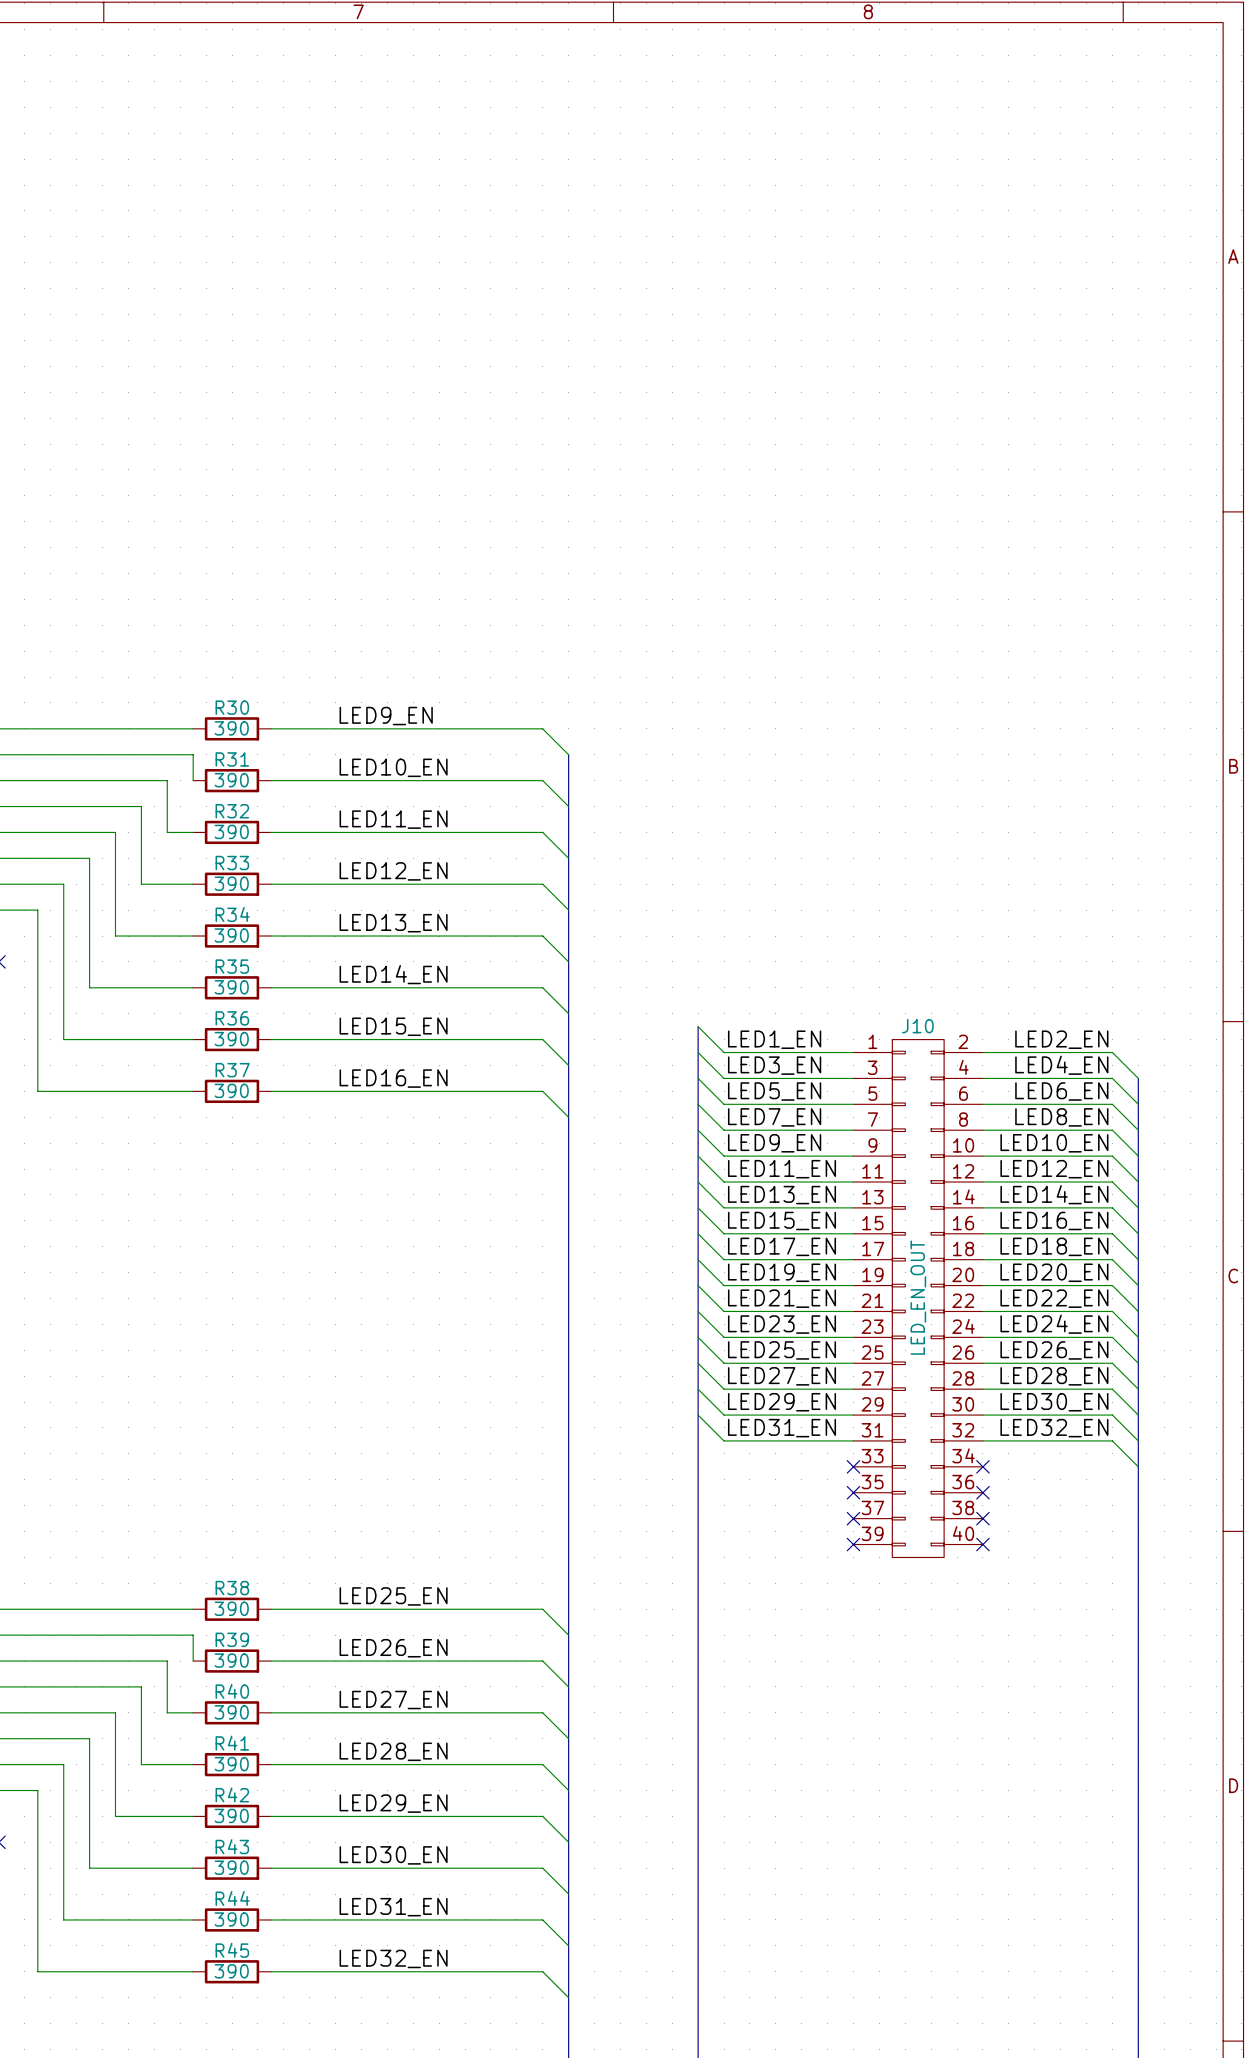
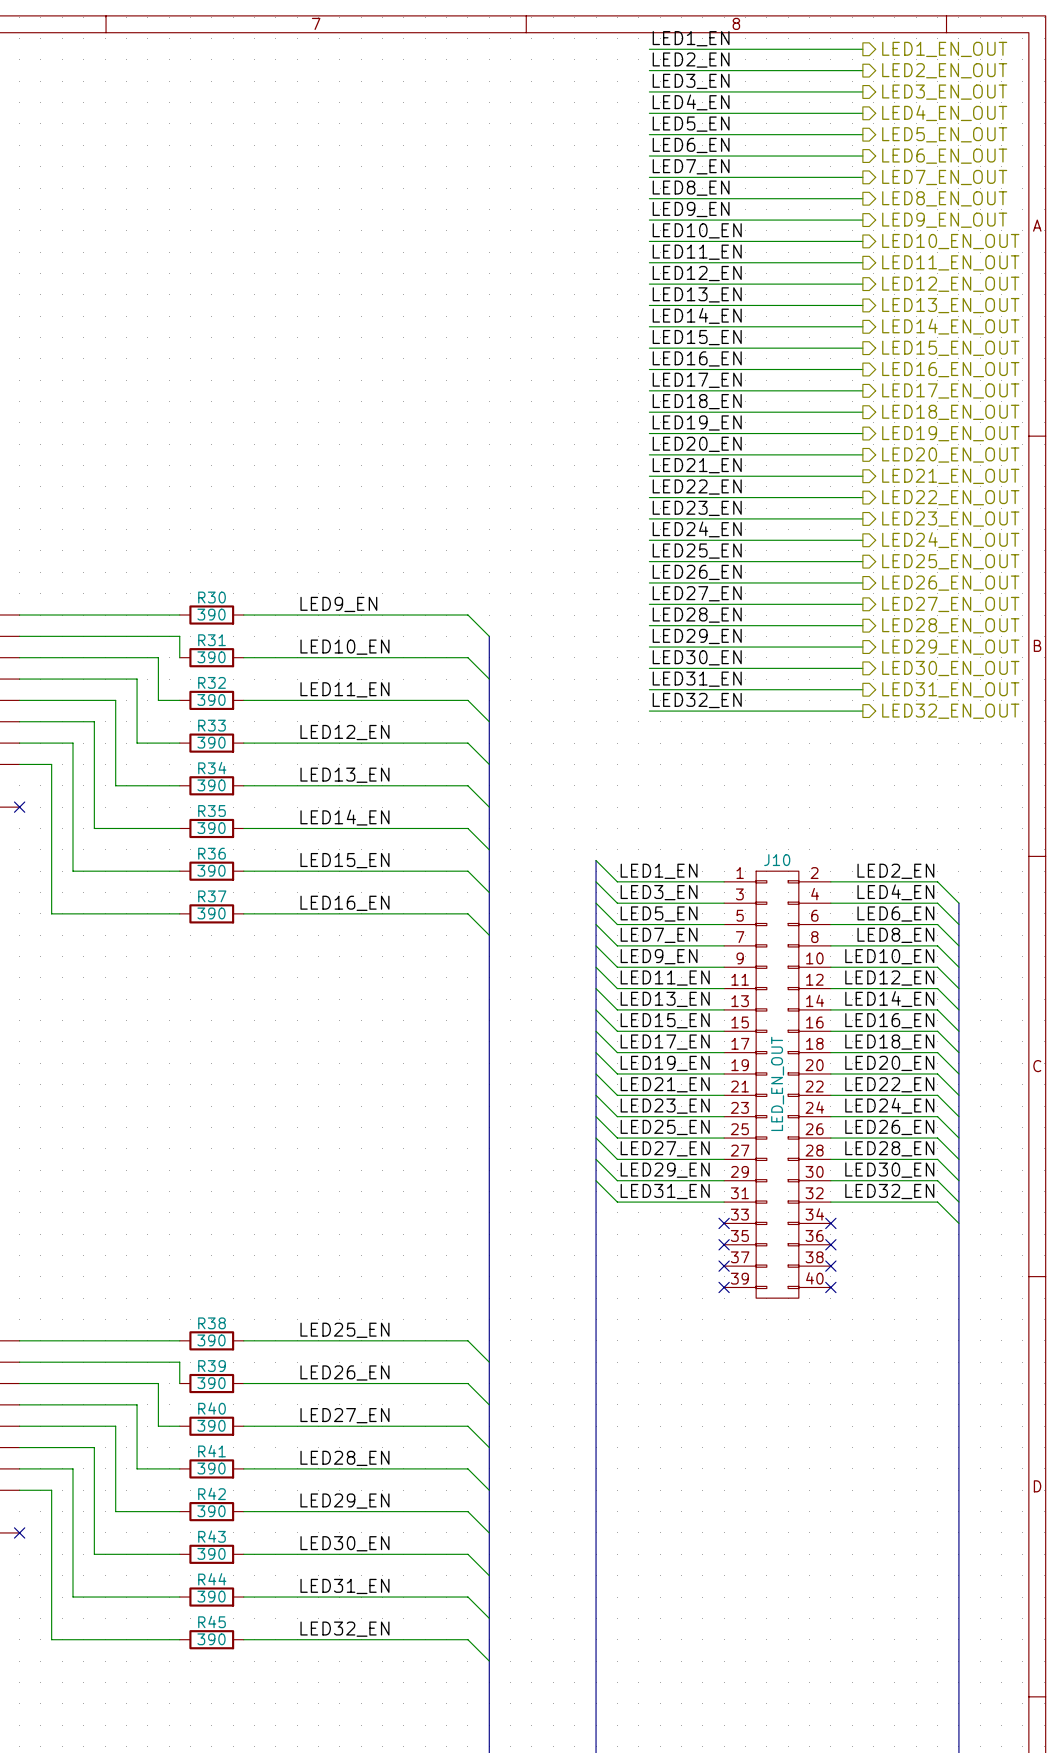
label: none -> LED1_EN (691, 38)
wire: none -> (649, 49) (862, 49)
hierarchical label: none -> LED1_EN_OUT (944, 49)
label: none -> LED2_EN (691, 60)
wire: none -> (649, 70) (862, 70)
hierarchical label: none -> LED2_EN_OUT (944, 70)
label: none -> LED3_EN (691, 81)
wire: none -> (649, 91) (862, 91)
hierarchical label: none -> LED3_EN_OUT (944, 92)
label: none -> LED4_EN (691, 102)
wire: none -> (649, 113) (862, 113)
hierarchical label: none -> LED4_EN_OUT (944, 113)
label: none -> LED5_EN (691, 124)
wire: none -> (649, 134) (862, 134)
hierarchical label: none -> LED5_EN_OUT (944, 134)
label: none -> LED6_EN (691, 145)
wire: none -> (649, 156) (862, 156)
hierarchical label: none -> LED6_EN_OUT (944, 156)
label: none -> LED7_EN (691, 166)
wire: none -> (649, 177) (862, 177)
hierarchical label: none -> LED7_EN_OUT (944, 177)
label: none -> LED8_EN (691, 188)
wire: none -> (649, 198) (862, 198)
hierarchical label: none -> LED8_EN_OUT (944, 198)
label: none -> LED9_EN (691, 209)
wire: none -> (649, 220) (862, 220)
hierarchical label: none -> LED9_EN_OUT (944, 220)
label: none -> LED10_EN (697, 230)
wire: none -> (649, 241) (862, 241)
hierarchical label: none -> LED10_EN_OUT (950, 241)
label: none -> LED11_EN (697, 252)
wire: none -> (649, 262) (862, 262)
hierarchical label: none -> LED11_EN_OUT (950, 262)
label: none -> LED12_EN (697, 273)
wire: none -> (649, 284) (862, 284)
hierarchical label: none -> LED12_EN_OUT (950, 284)
label: none -> LED13_EN (697, 294)
wire: none -> (649, 305) (862, 305)
hierarchical label: none -> LED13_EN_OUT (950, 305)
label: none -> LED14_EN (697, 315)
wire: none -> (649, 326) (862, 326)
hierarchical label: none -> LED14_EN_OUT (950, 326)
label: none -> LED15_EN (697, 337)
wire: none -> (649, 348) (862, 348)
hierarchical label: none -> LED15_EN_OUT (950, 348)
label: none -> LED16_EN (697, 358)
wire: none -> (649, 369) (862, 369)
hierarchical label: none -> LED16_EN_OUT (950, 369)
label: none -> LED17_EN (697, 380)
wire: none -> (649, 390) (862, 390)
hierarchical label: none -> LED17_EN_OUT (950, 390)
label: none -> LED18_EN (697, 401)
wire: none -> (649, 412) (862, 412)
hierarchical label: none -> LED18_EN_OUT (950, 412)
label: none -> LED19_EN (697, 422)
wire: none -> (649, 433) (862, 433)
hierarchical label: none -> LED19_EN_OUT (950, 433)
label: none -> LED20_EN (697, 444)
wire: none -> (649, 454) (862, 454)
hierarchical label: none -> LED20_EN_OUT (950, 455)
label: none -> LED21_EN (697, 465)
wire: none -> (649, 476) (862, 476)
hierarchical label: none -> LED21_EN_OUT (950, 476)
label: none -> LED22_EN (697, 487)
wire: none -> (649, 497) (862, 497)
hierarchical label: none -> LED22_EN_OUT (950, 497)
label: none -> LED23_EN (697, 508)
wire: none -> (649, 518) (862, 518)
hierarchical label: none -> LED23_EN_OUT (950, 519)
label: none -> LED24_EN (697, 529)
wire: none -> (649, 540) (862, 540)
hierarchical label: none -> LED24_EN_OUT (950, 540)
label: none -> LED25_EN (697, 551)
wire: none -> (649, 561) (862, 561)
hierarchical label: none -> LED25_EN_OUT (950, 561)
label: none -> LED26_EN (697, 572)
wire: none -> (649, 582) (862, 582)
hierarchical label: none -> LED26_EN_OUT (950, 583)
label: none -> LED27_EN (697, 593)
wire: none -> (649, 604) (862, 604)
hierarchical label: none -> LED27_EN_OUT (950, 604)
label: none -> LED28_EN (697, 615)
wire: none -> (649, 625) (862, 625)
hierarchical label: none -> LED28_EN_OUT (950, 625)
label: none -> LED29_EN (697, 636)
wire: none -> (649, 647) (862, 647)
hierarchical label: none -> LED29_EN_OUT (950, 647)
label: none -> LED30_EN (697, 657)
wire: none -> (649, 668) (862, 668)
hierarchical label: none -> LED30_EN_OUT (950, 668)
label: none -> LED31_EN (697, 679)
wire: none -> (649, 689) (862, 689)
hierarchical label: none -> LED31_EN_OUT (950, 689)
label: none -> LED32_EN (697, 700)
wire: none -> (649, 711) (862, 711)
hierarchical label: none -> LED32_EN_OUT (950, 711)

